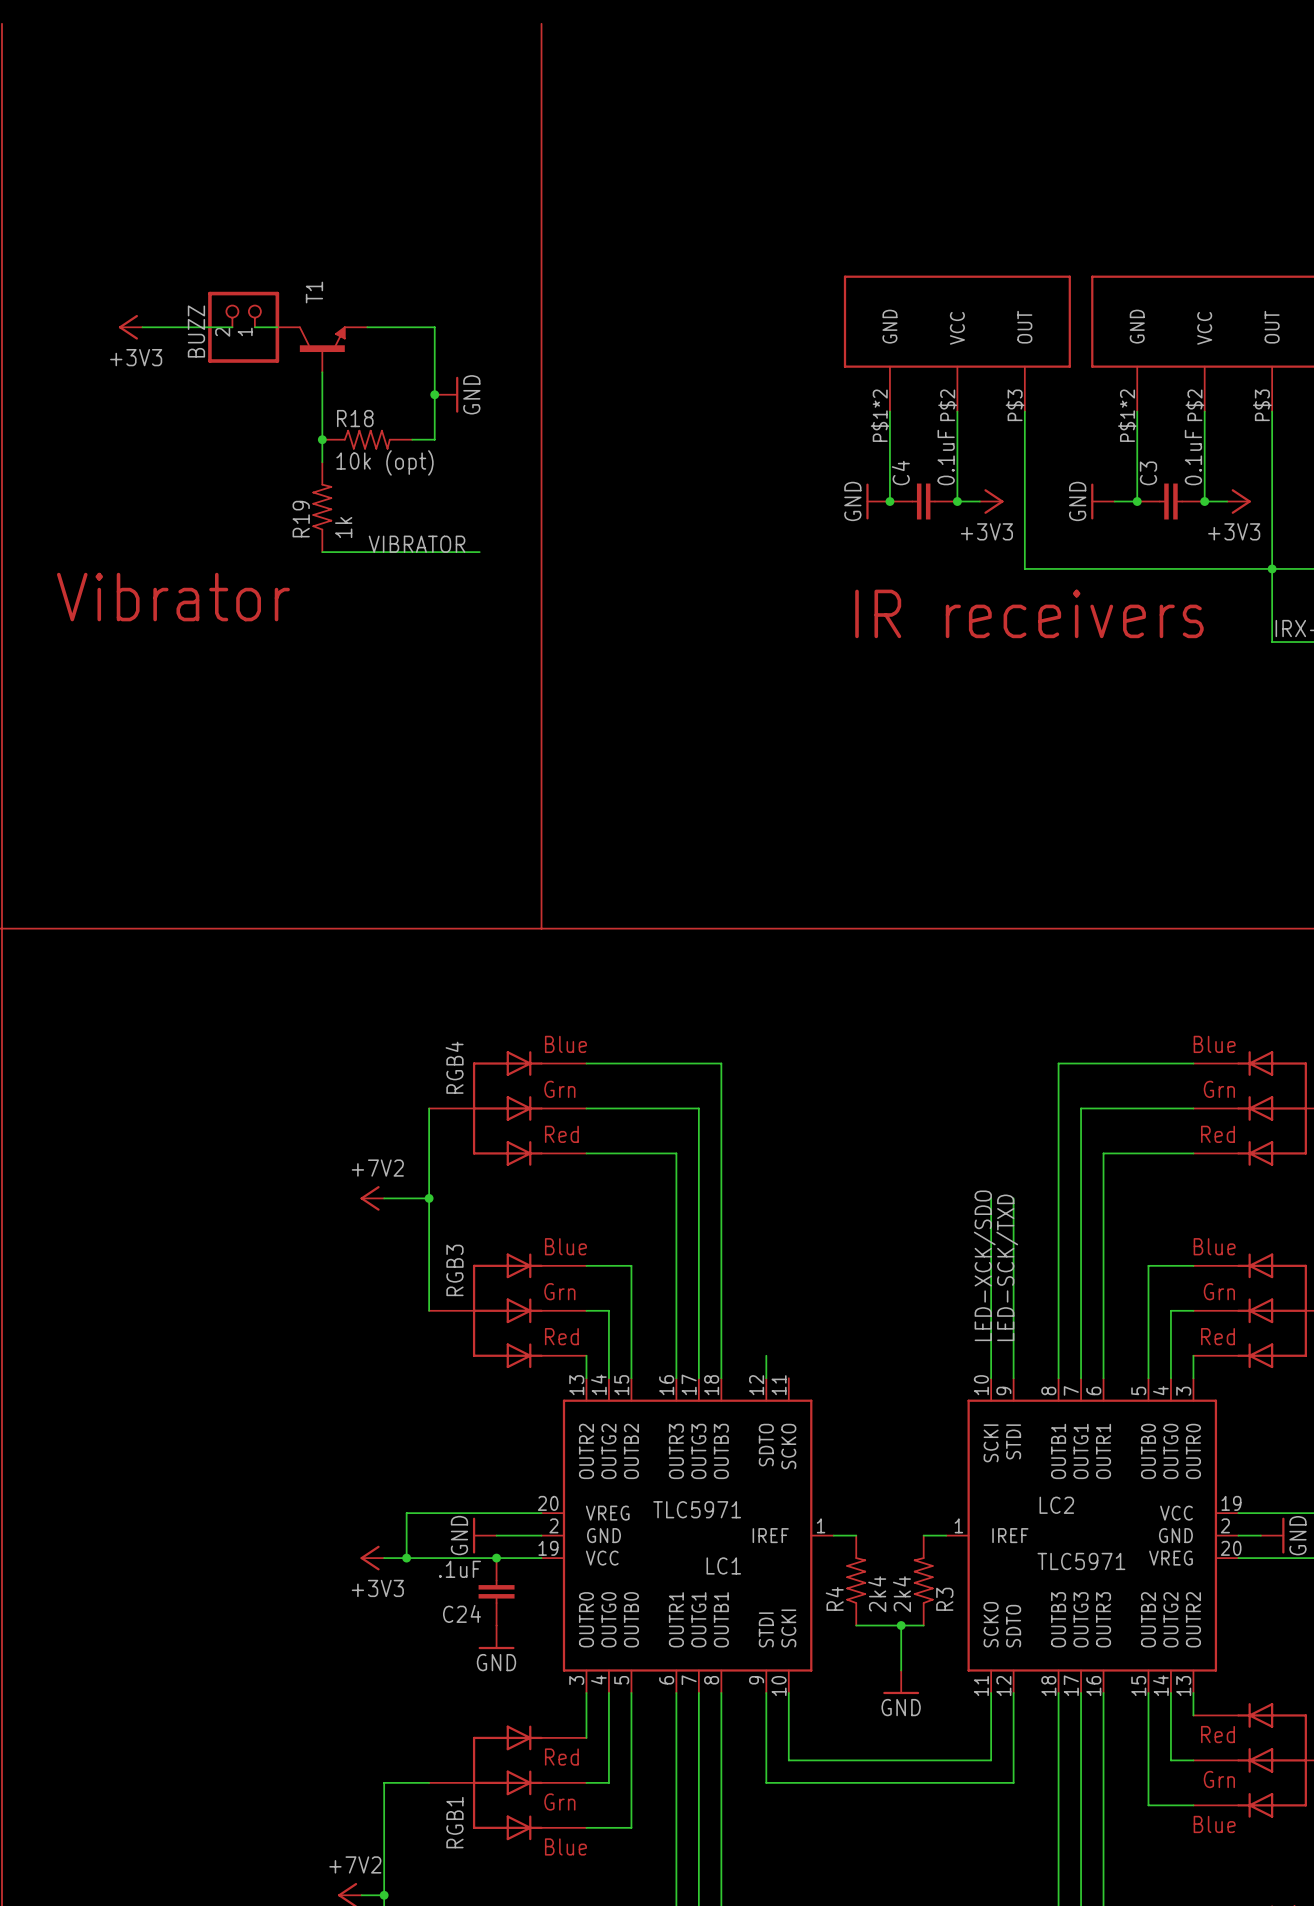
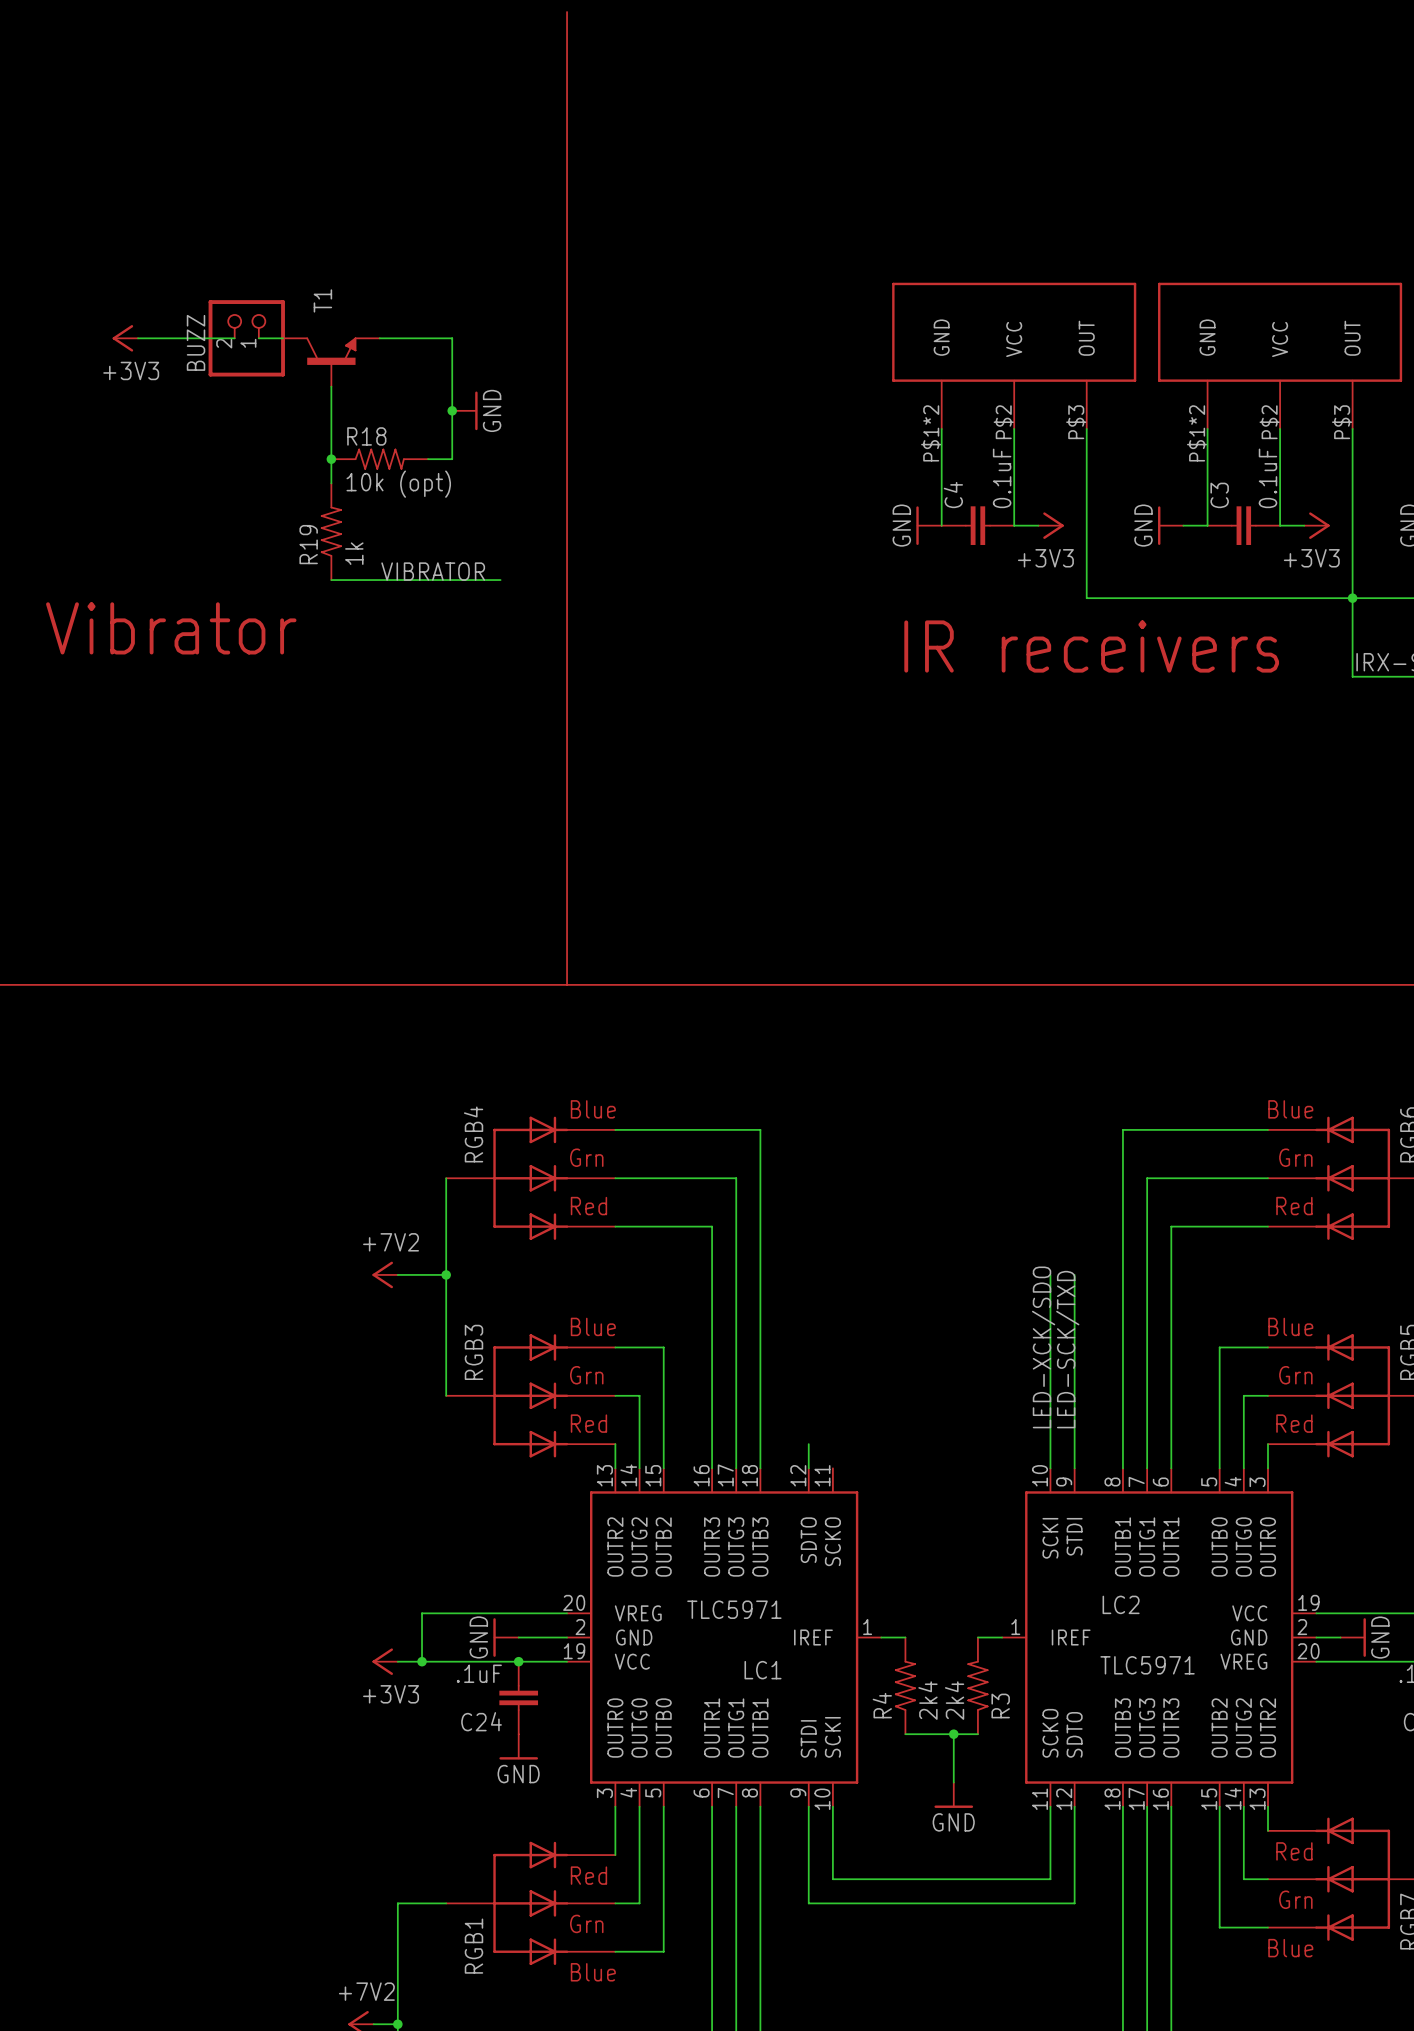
junction: (889, 501) -> none
junction: (957, 501) -> none
junction: (1137, 501) -> none
junction: (1204, 501) -> none

